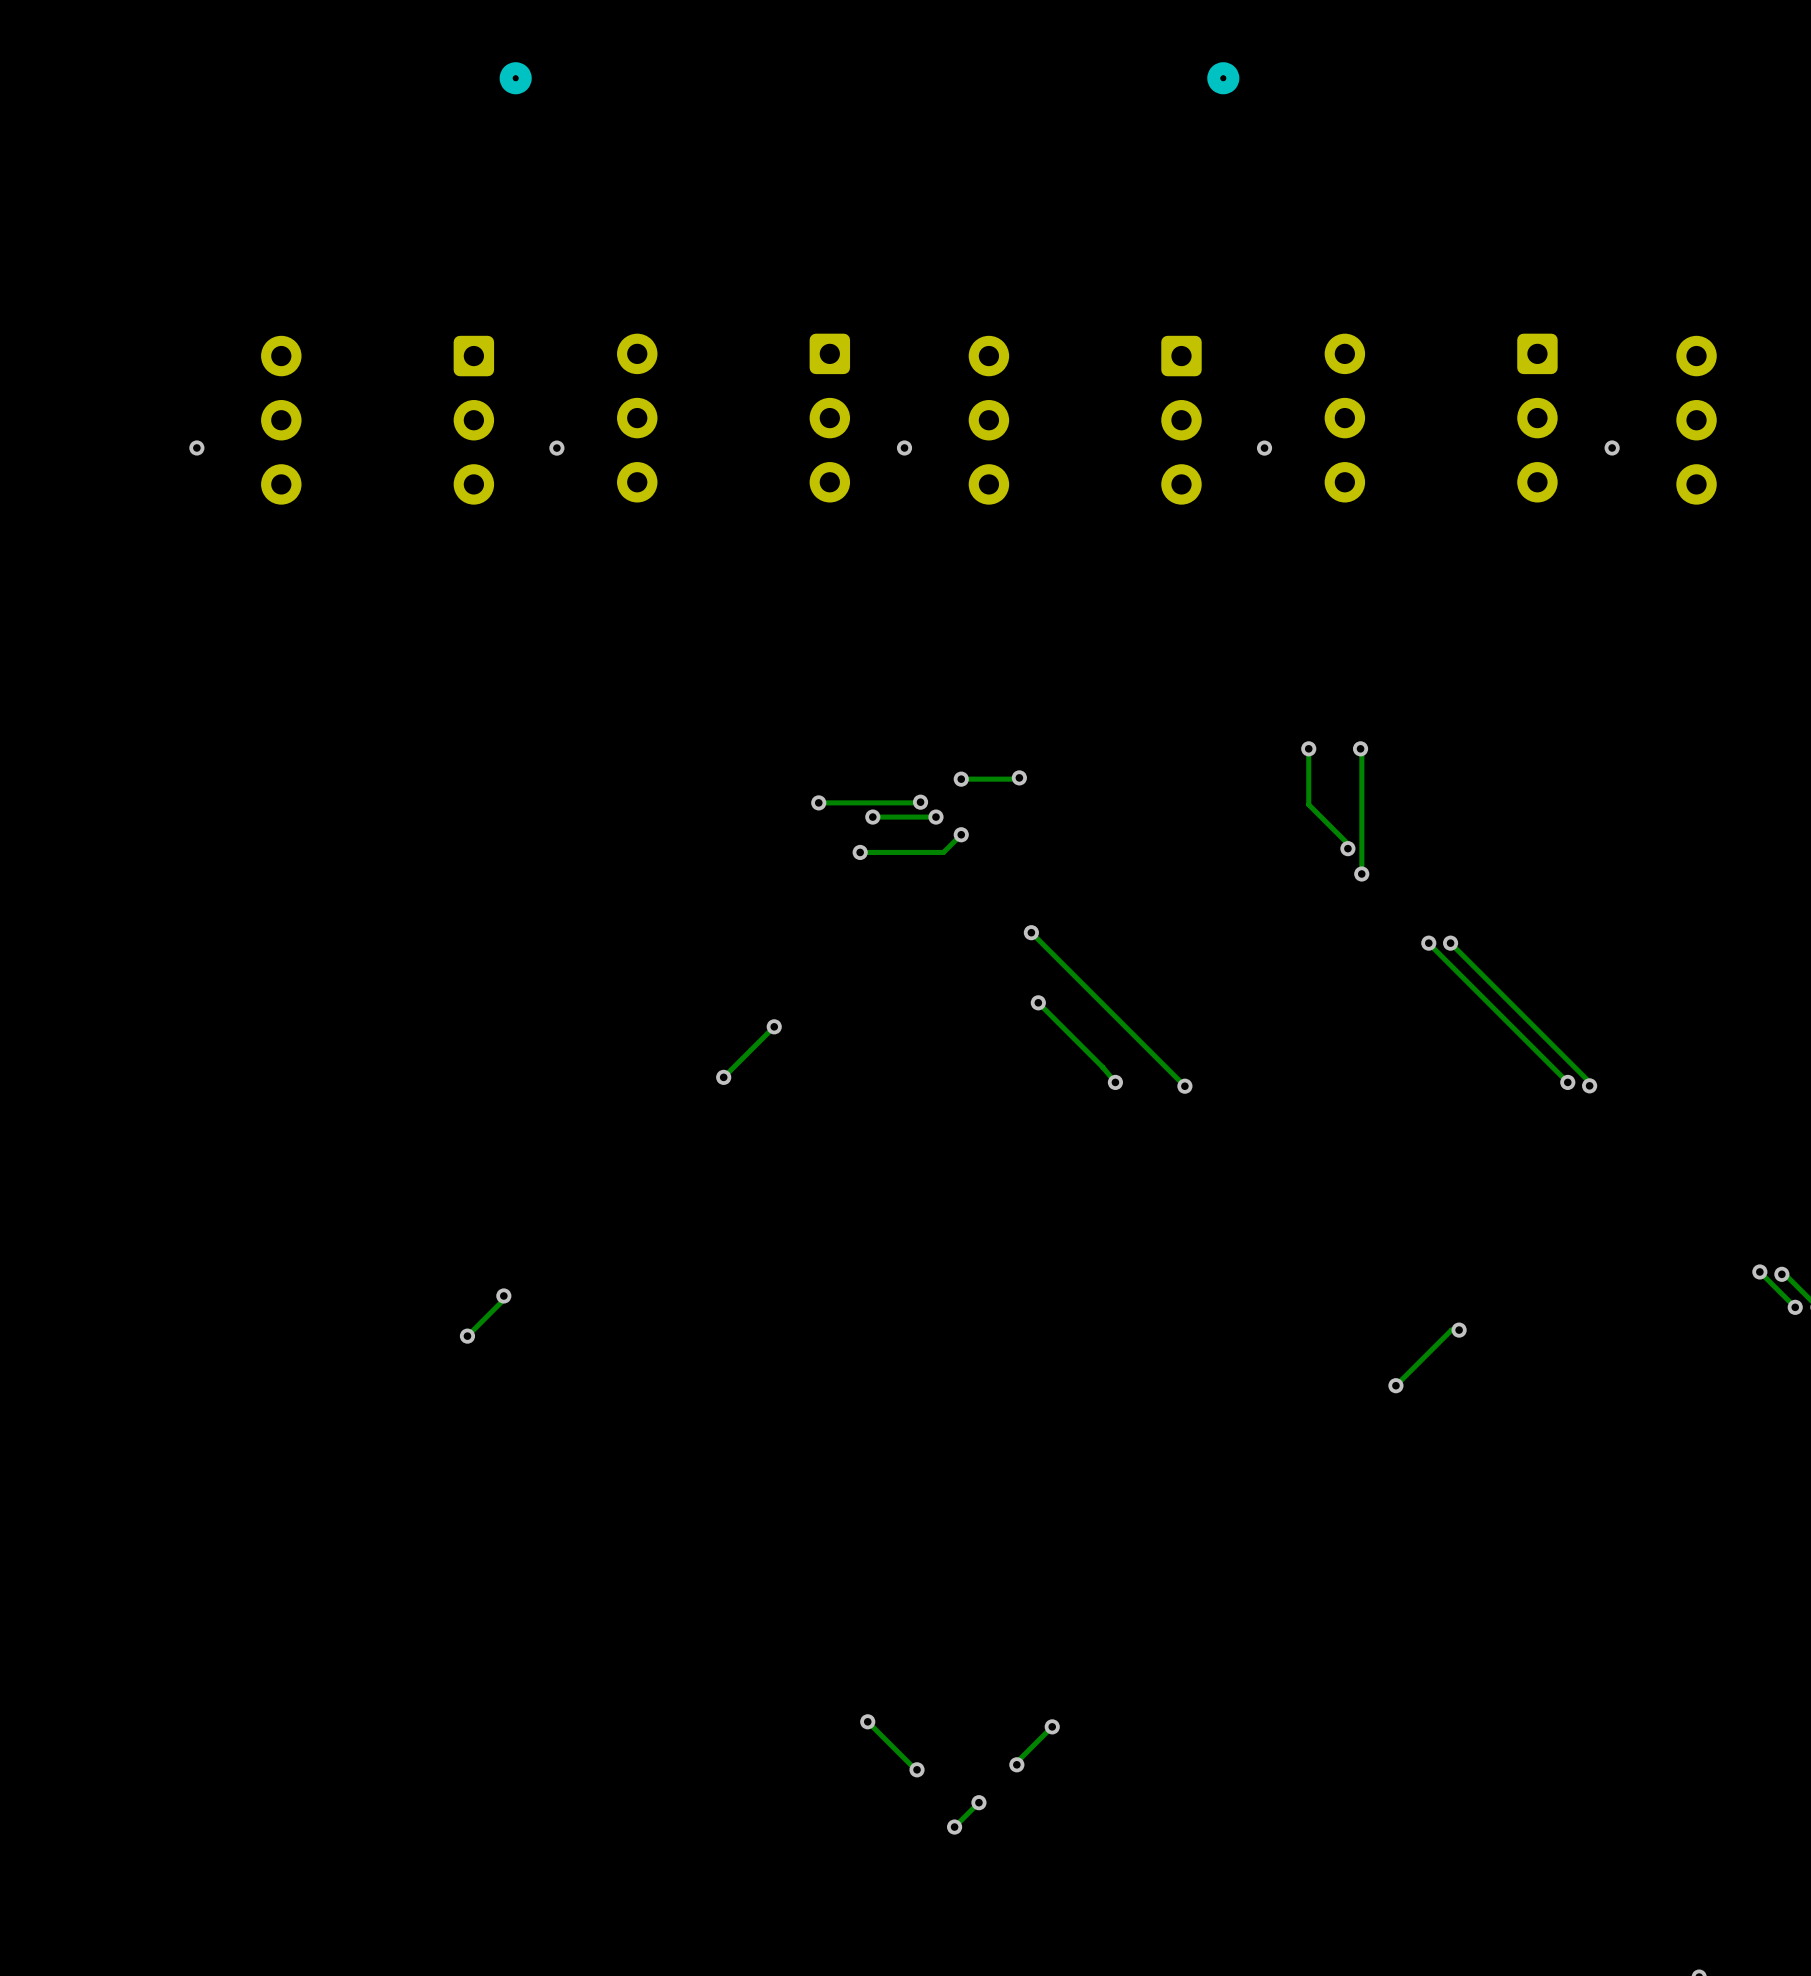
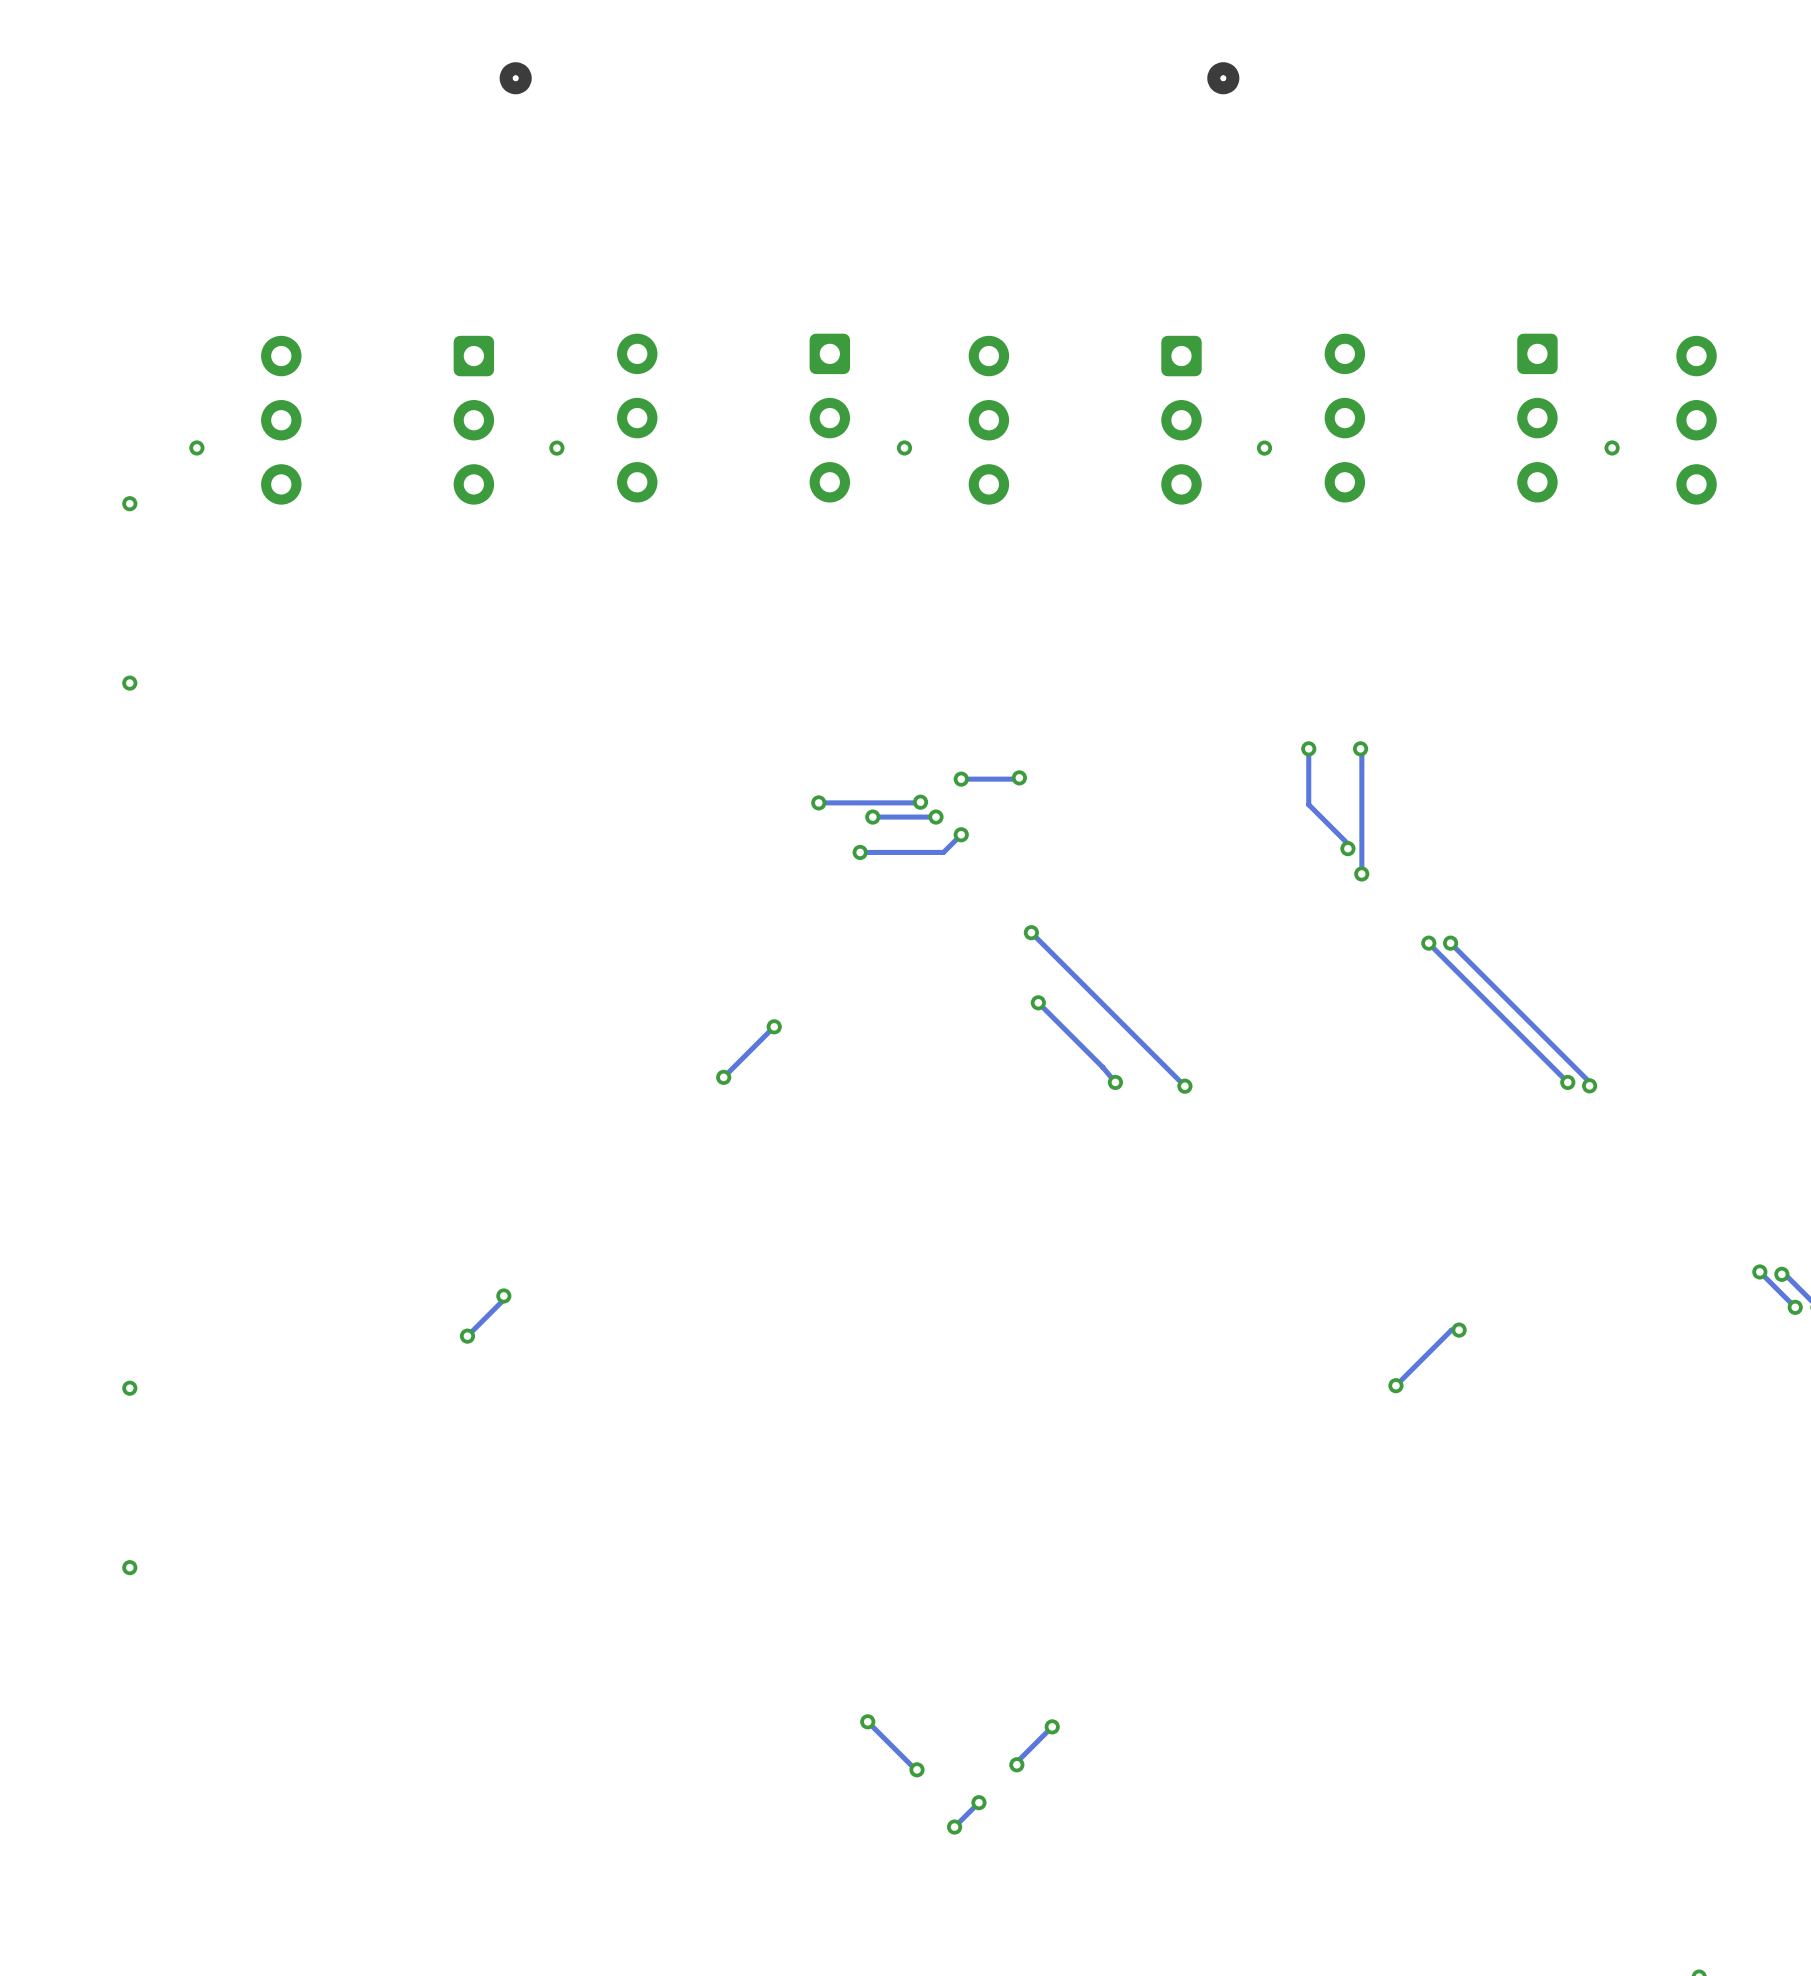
via: none -> (129, 503)
via: none -> (129, 683)
via: none -> (129, 1388)
via: none -> (129, 1567)

